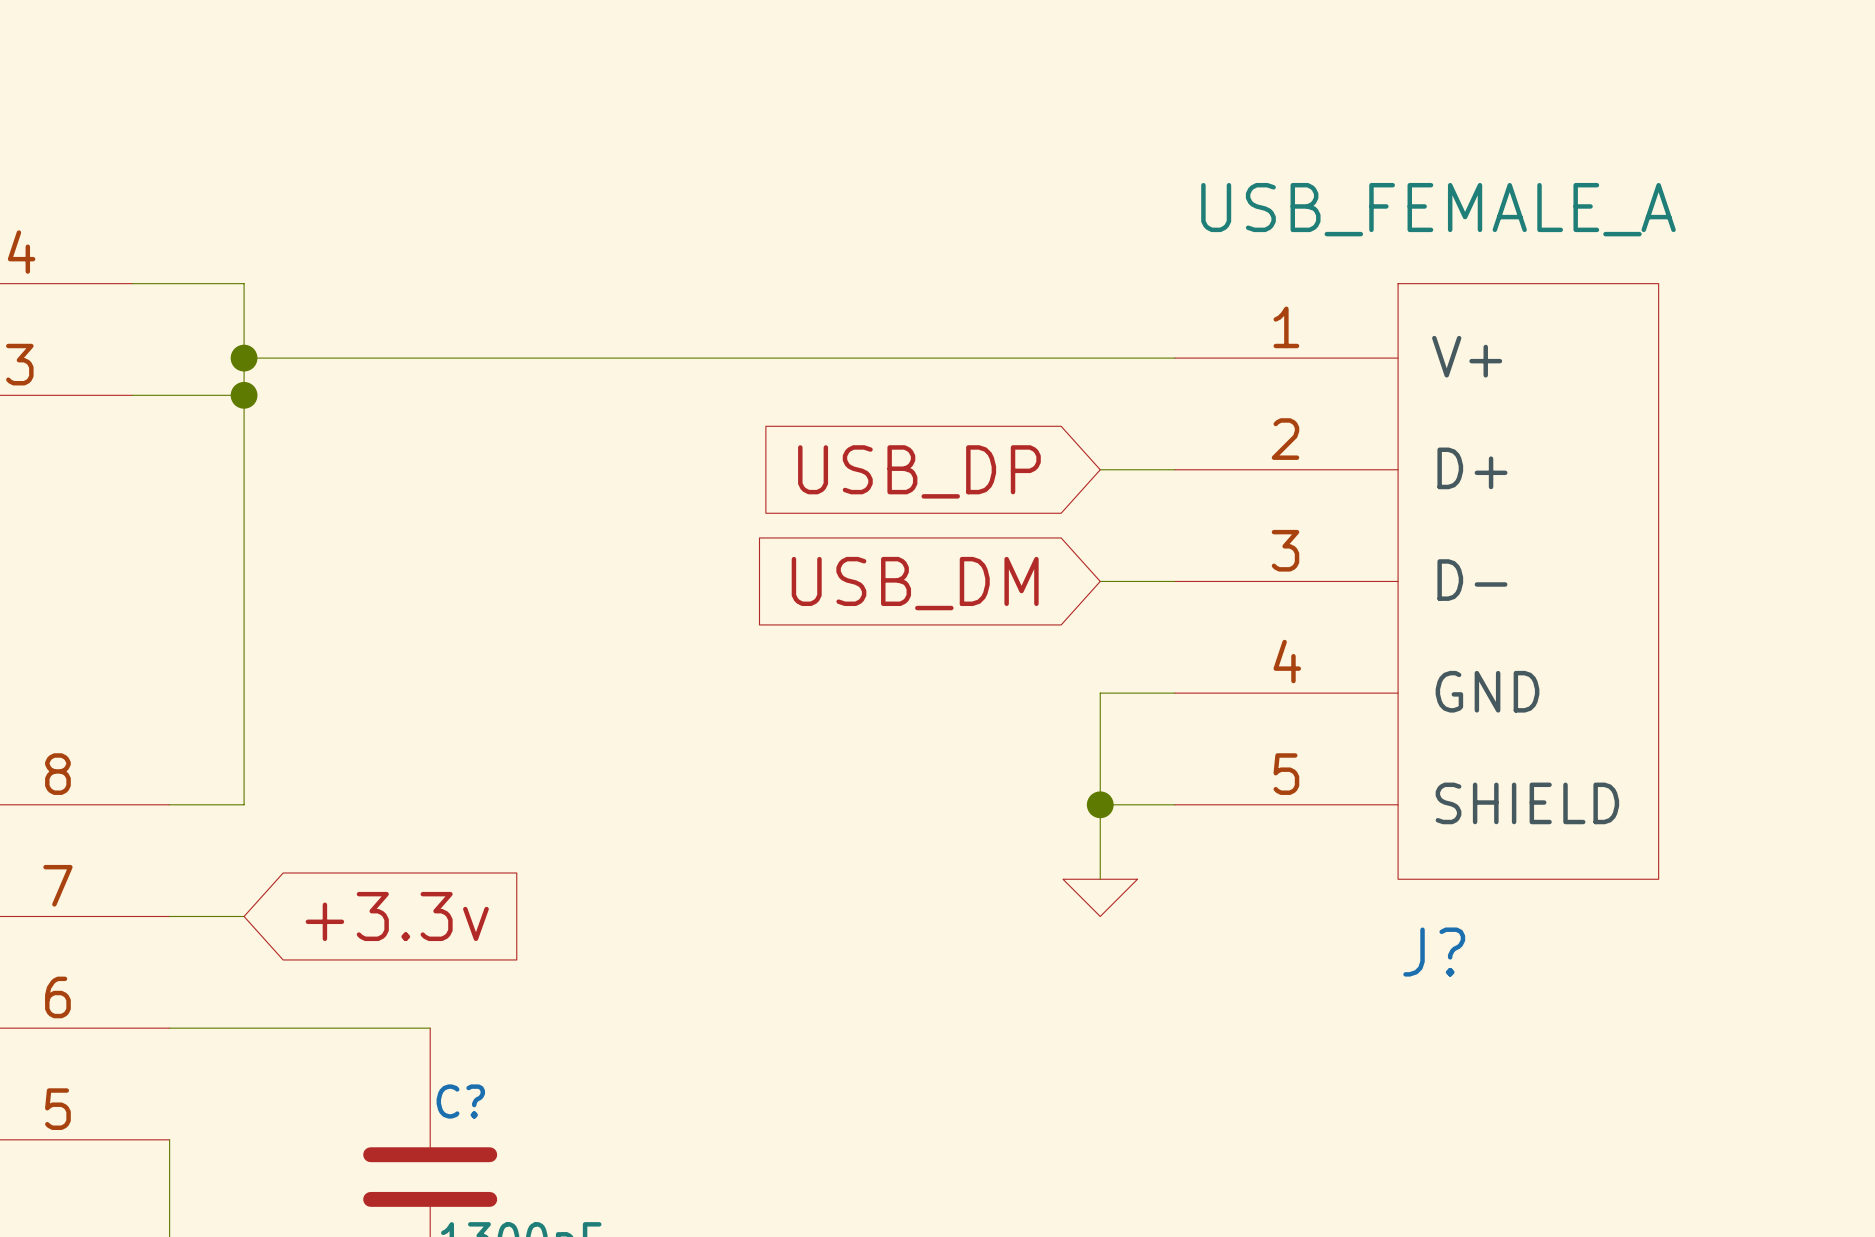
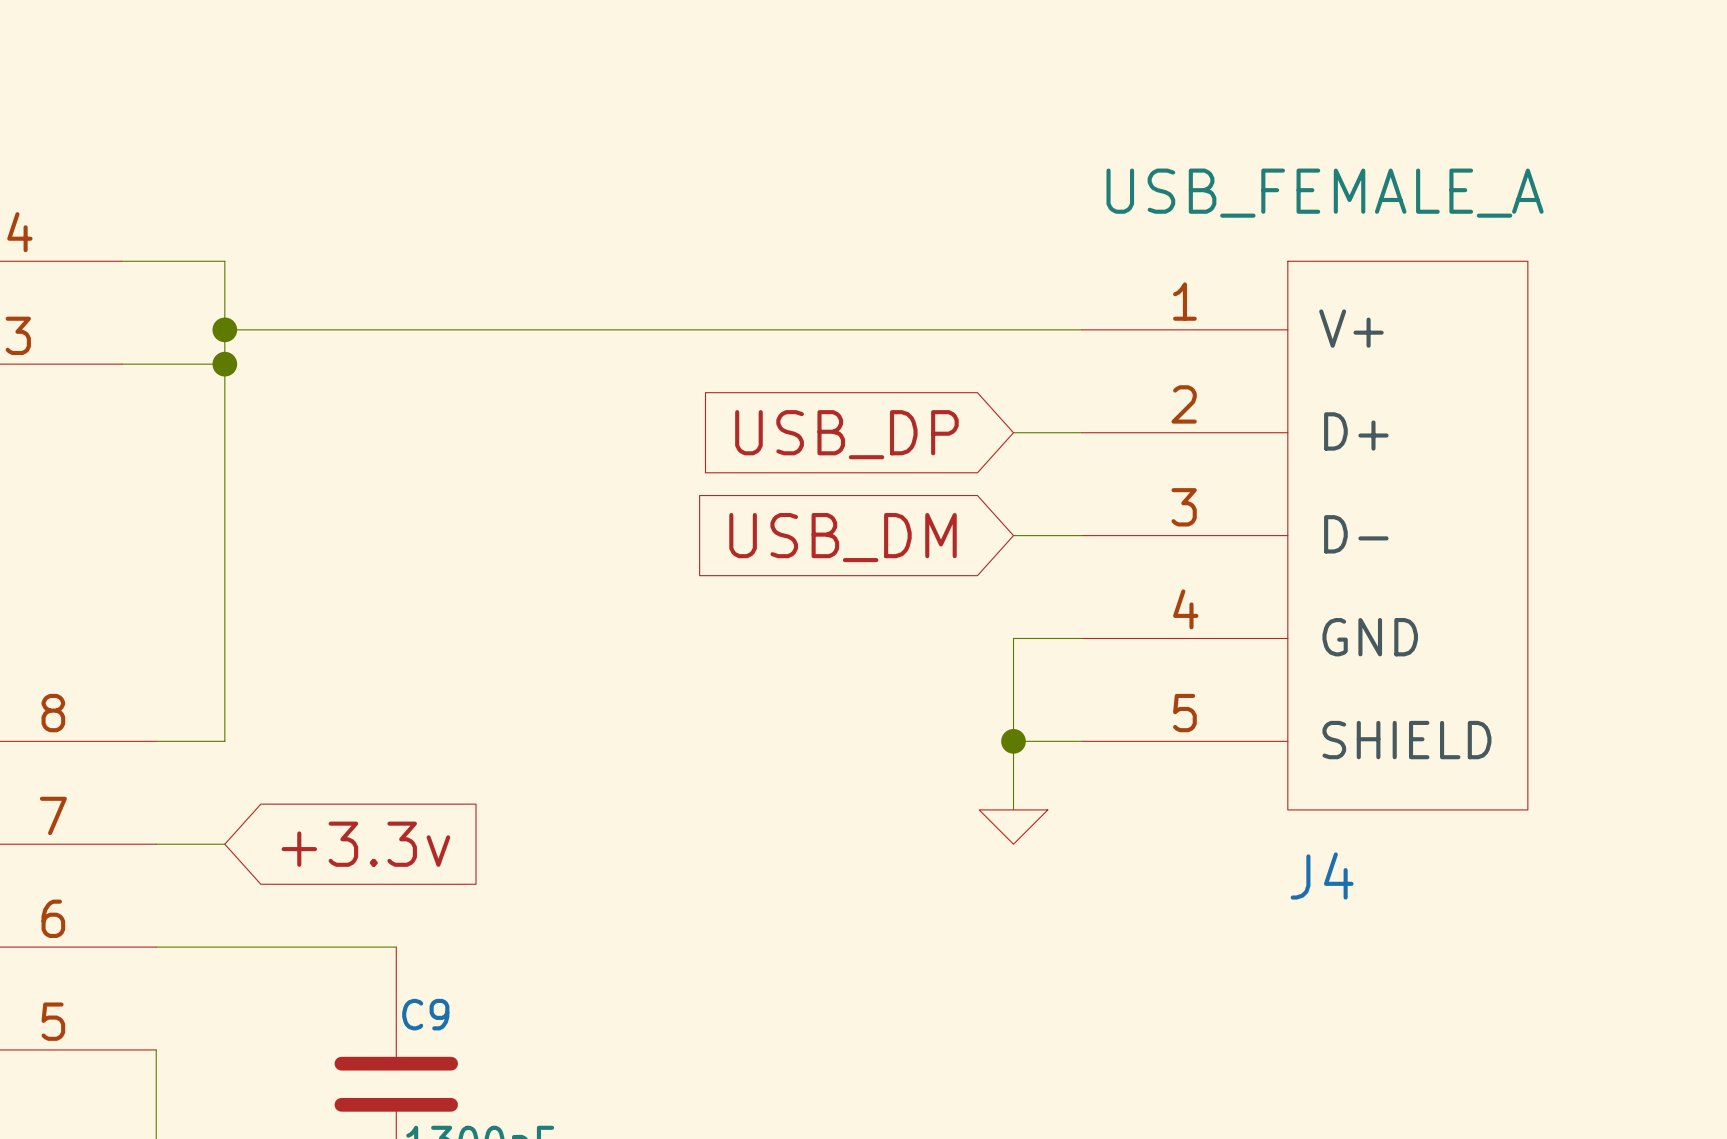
J? name: J? (1434, 952) -> J4 (1322, 875)
C? name: C? (460, 1101) -> C9 (425, 1014)

